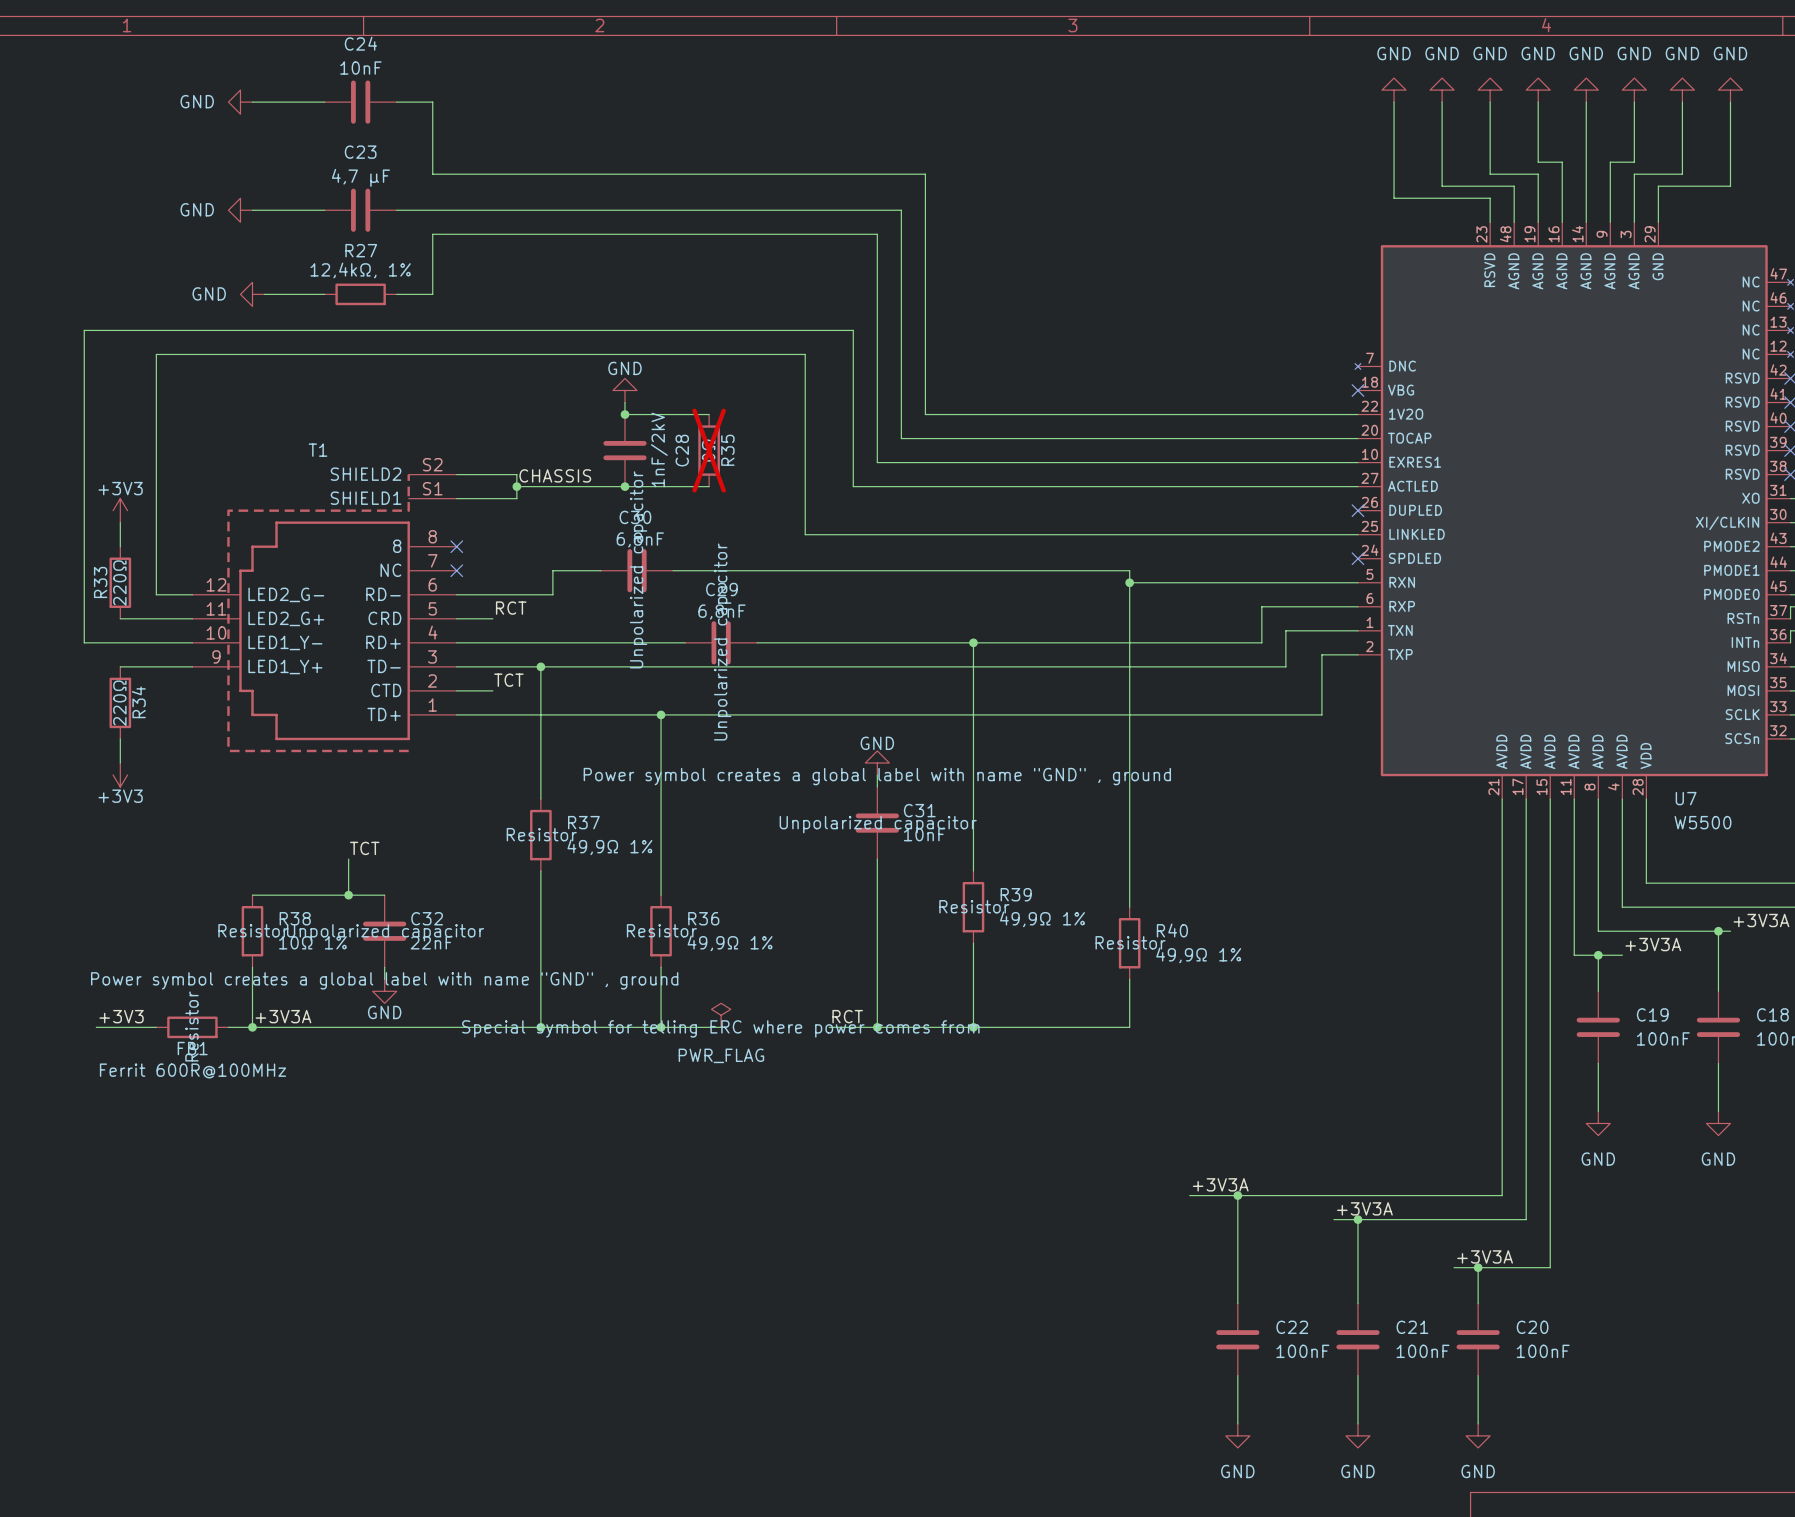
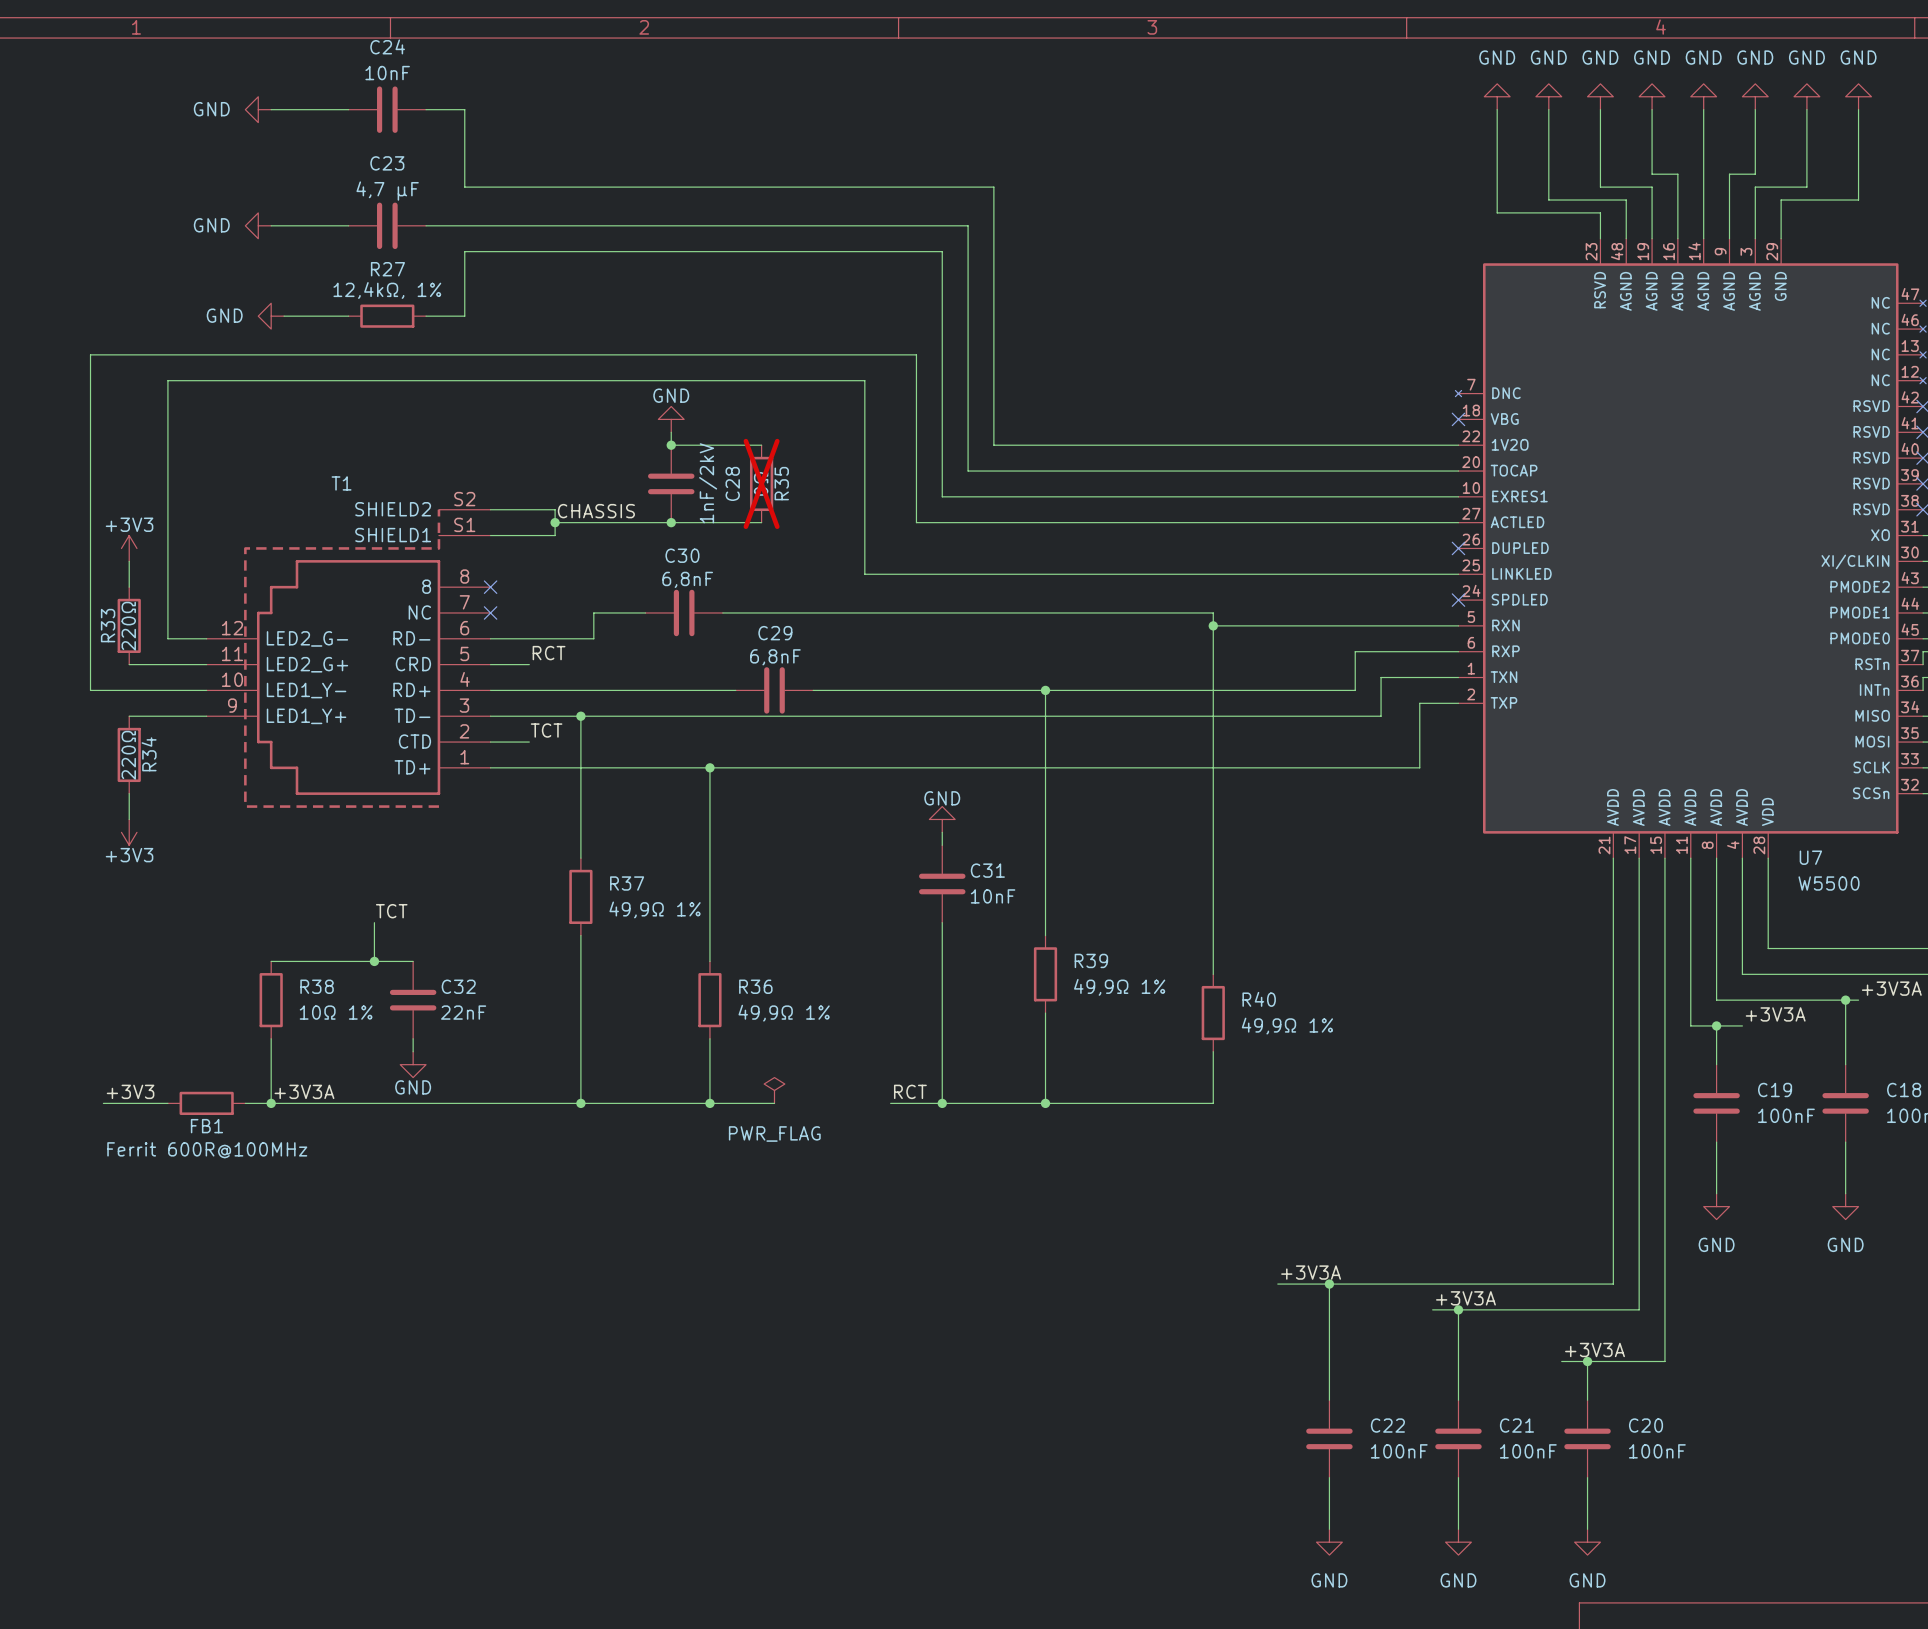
C30 text: Unpolarized capacitor (638, 569) -> none
C29 text: Unpolarized capacitor (722, 641) -> none
power symbol text: Power symbol creates a global label with name "GND" , ground (877, 776) -> none
C31 text: Unpolarized capacitor (878, 824) -> none
R37 text: Resistor (541, 834) -> none
R39 text: Resistor (974, 906) -> none
R38 text: Resistor (253, 930) -> none
R36 text: Resistor (661, 930) -> none
C32 text: Unpolarized capacitor (385, 932) -> none
R40 text: Resistor (1130, 942) -> none
power symbol text: Power symbol creates a global label with name "GND" , ground (384, 980) -> none
FB1 text: Resistor (191, 1026) -> none
power symbol text: Special symbol for telling ERC where power comes from (720, 1028) -> none

